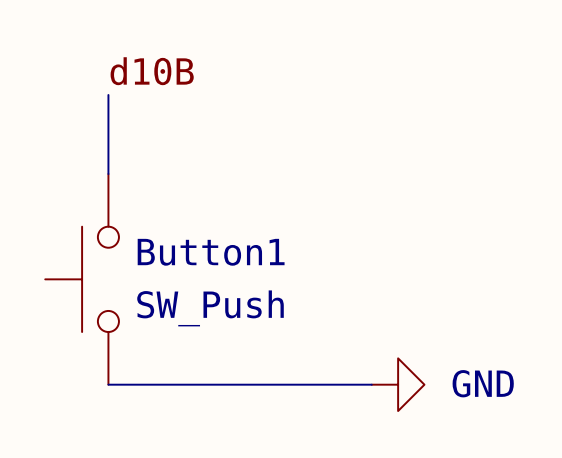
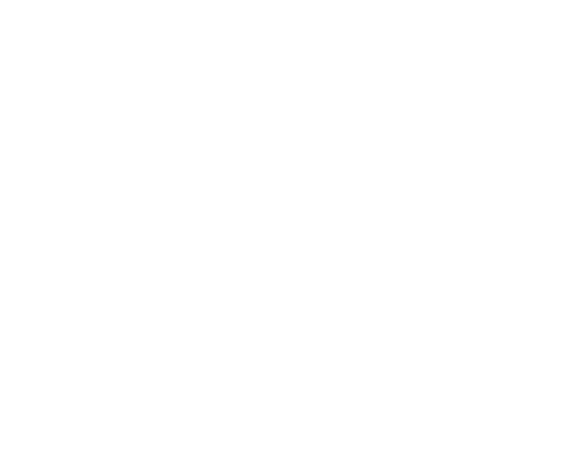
label: d10B (152, 71) -> none
wire: (108, 95) (108, 174) -> none
Button1: SW_Push (82, 279) -> none
wire: (108, 384) (371, 384) -> none
power symbol: GND (398, 384) -> none

